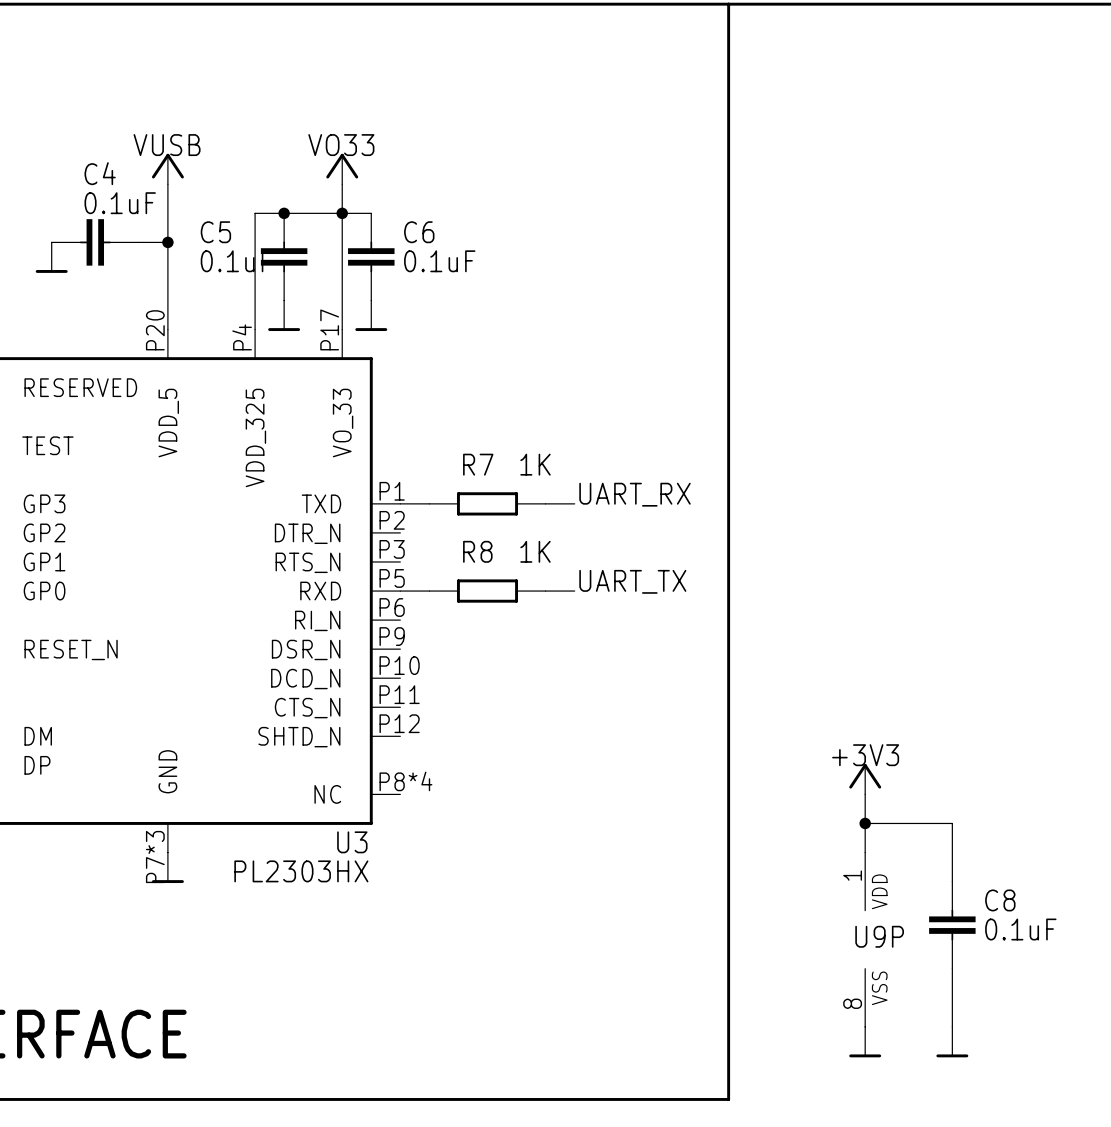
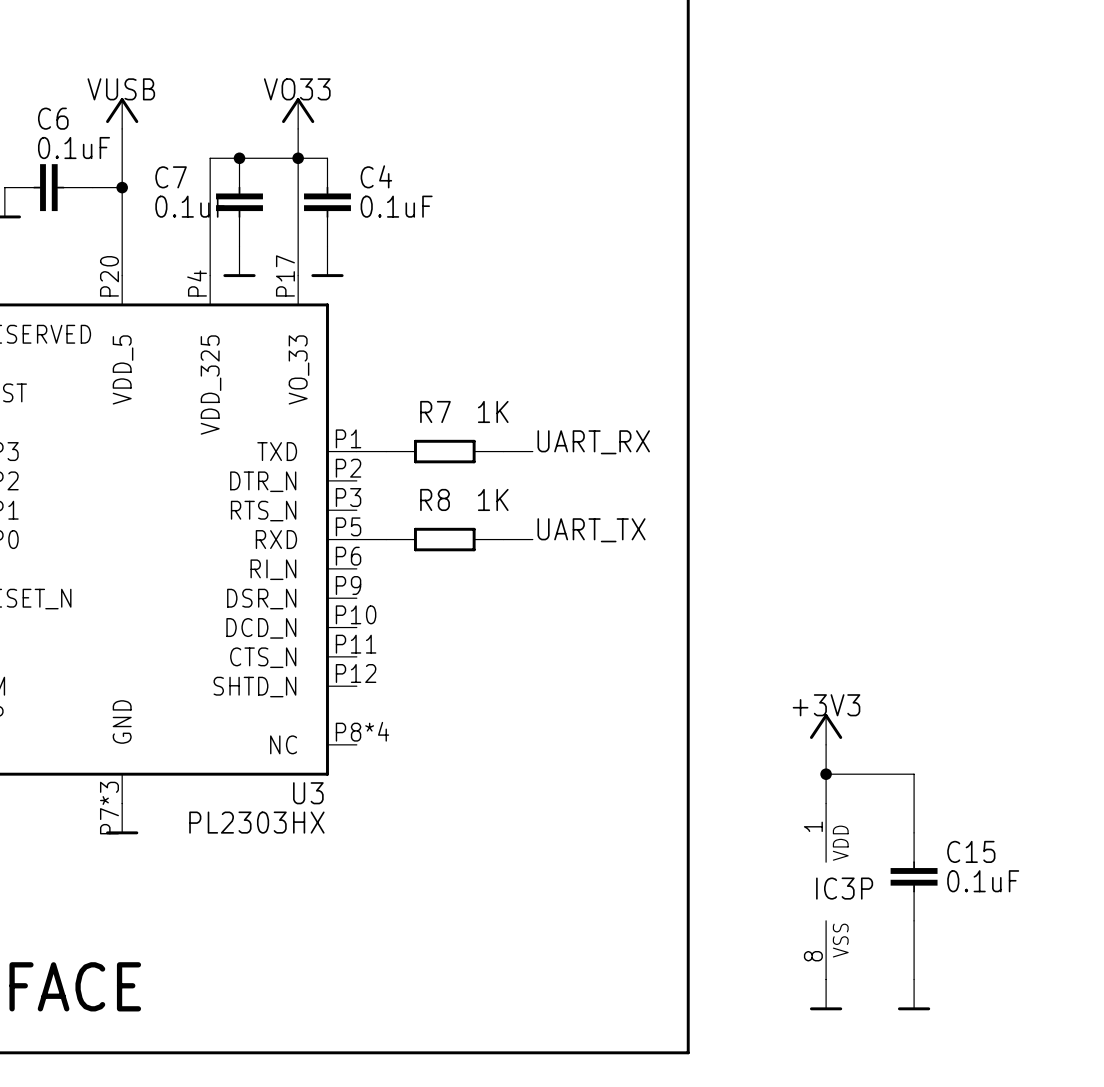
C4 name: C4 (100, 173) -> C6 (53, 118)
C5 name: C5 (215, 232) -> C7 (171, 177)
C6 name: C6 (419, 232) -> C4 (376, 176)
C8 name: C8 (1000, 900) -> C15 (971, 851)
U9P name: U9P (879, 936) -> IC3P (844, 888)

